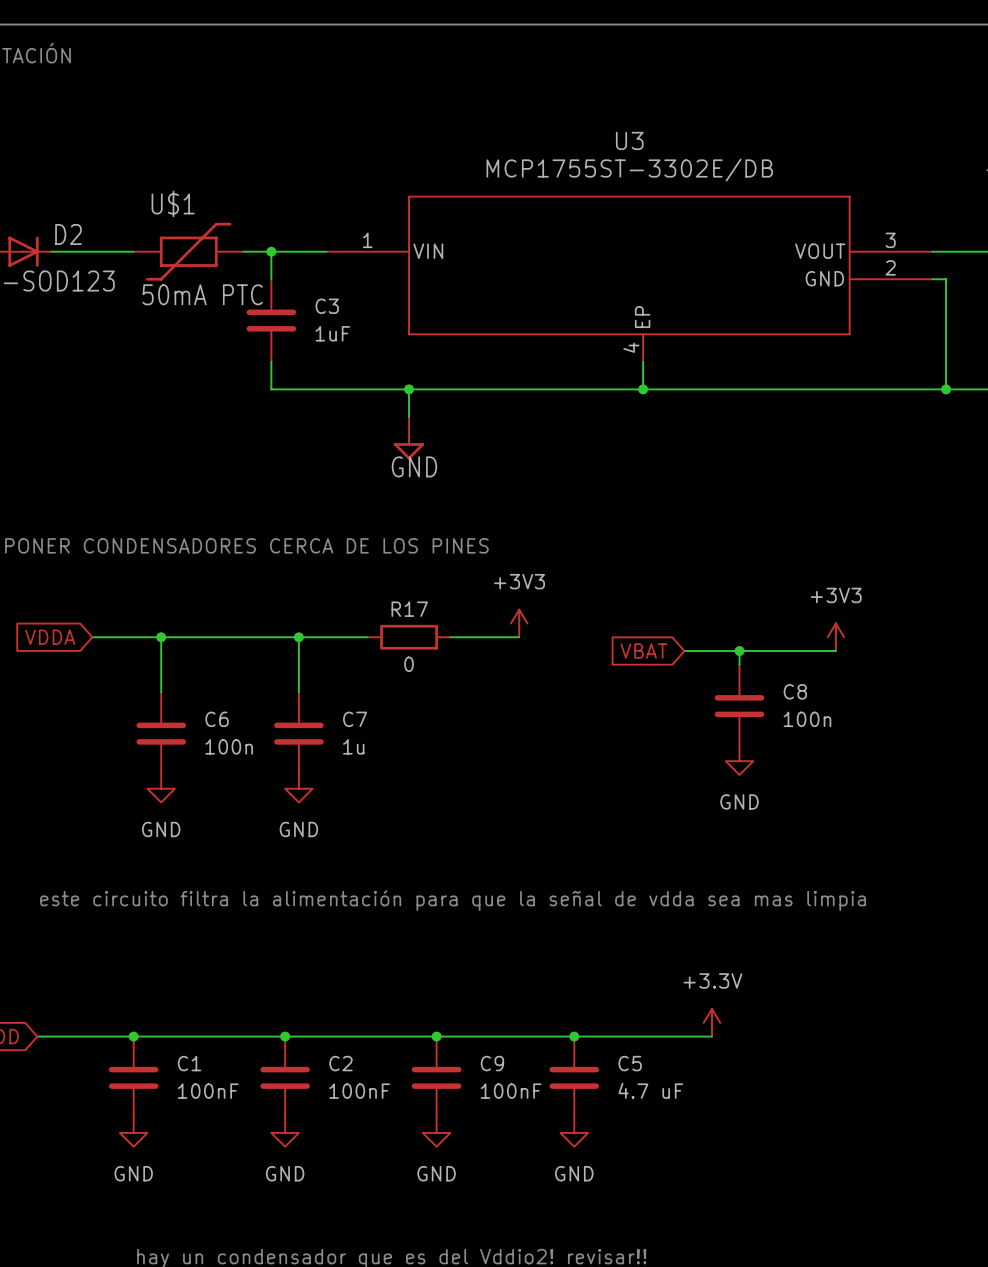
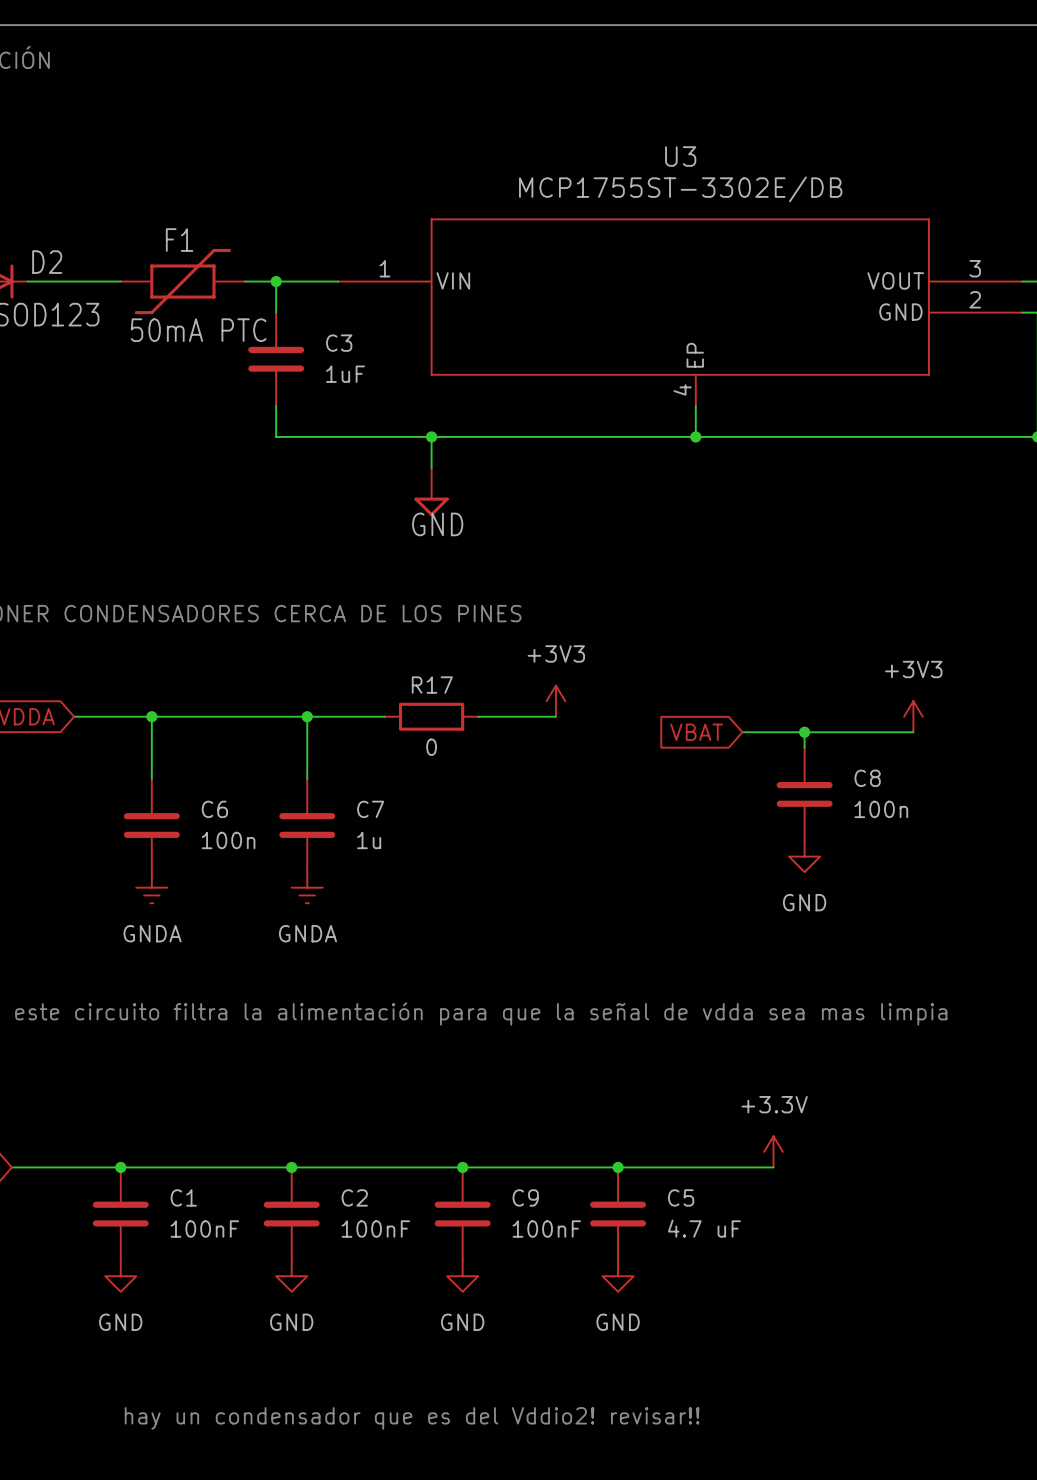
U$1 name: U$1 (173, 203) -> F1 (179, 240)
power symbol: GND (161, 788) -> GNDA (151, 887)
power symbol: GND (298, 788) -> GNDA (307, 887)

